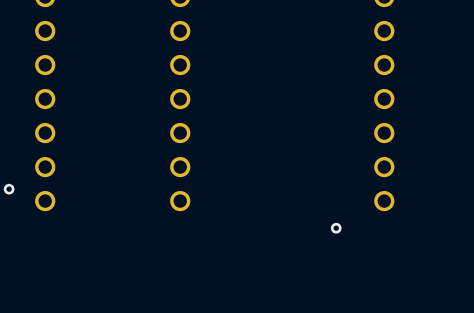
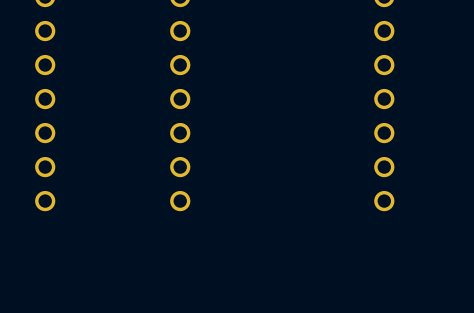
via: (9, 189) -> none
via: (336, 228) -> none

